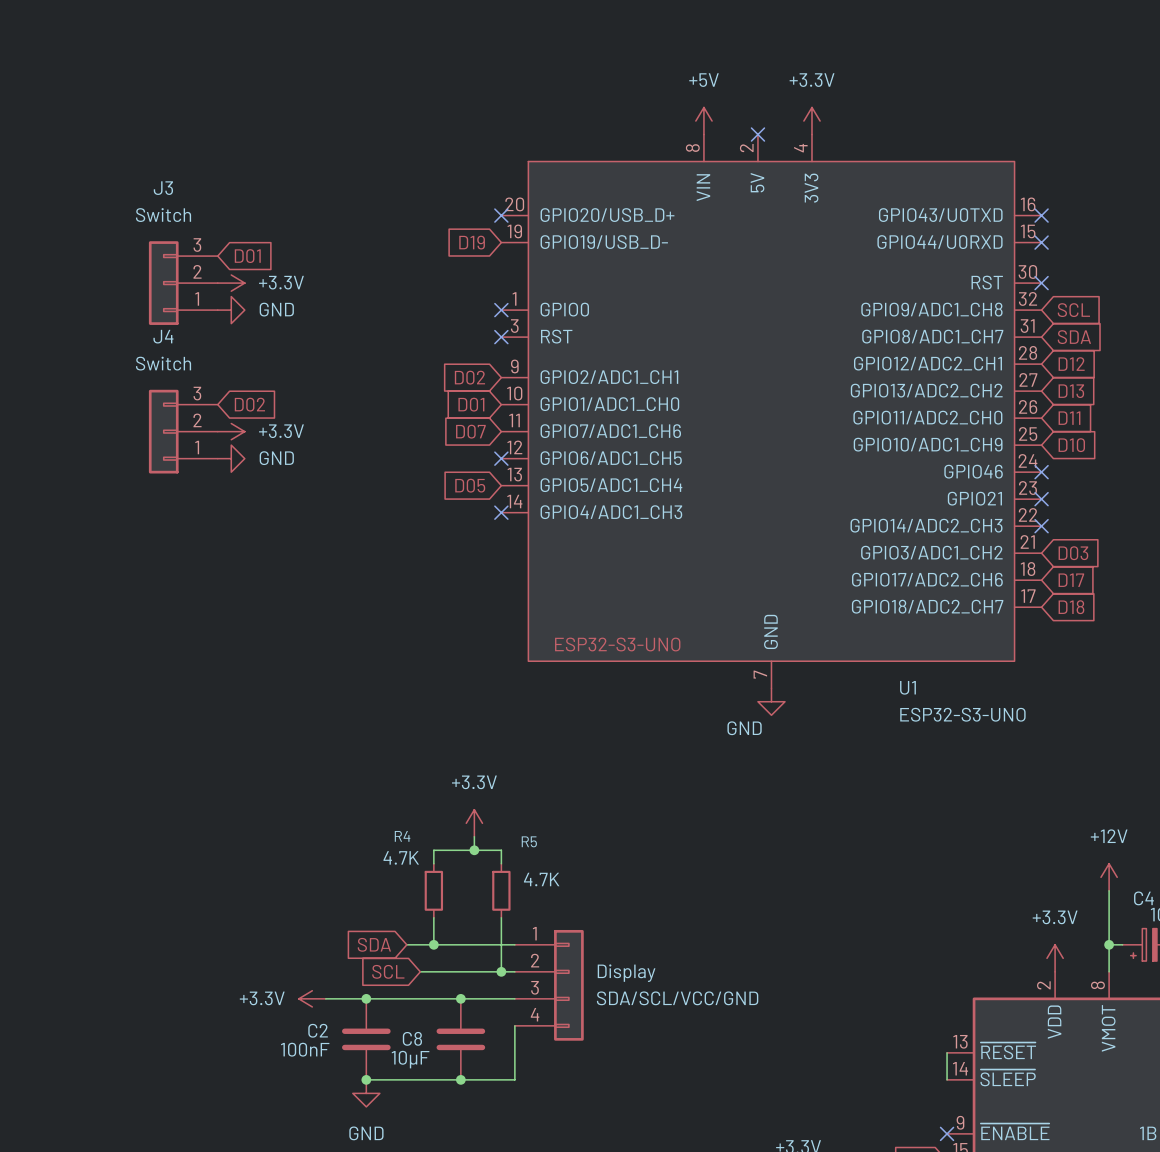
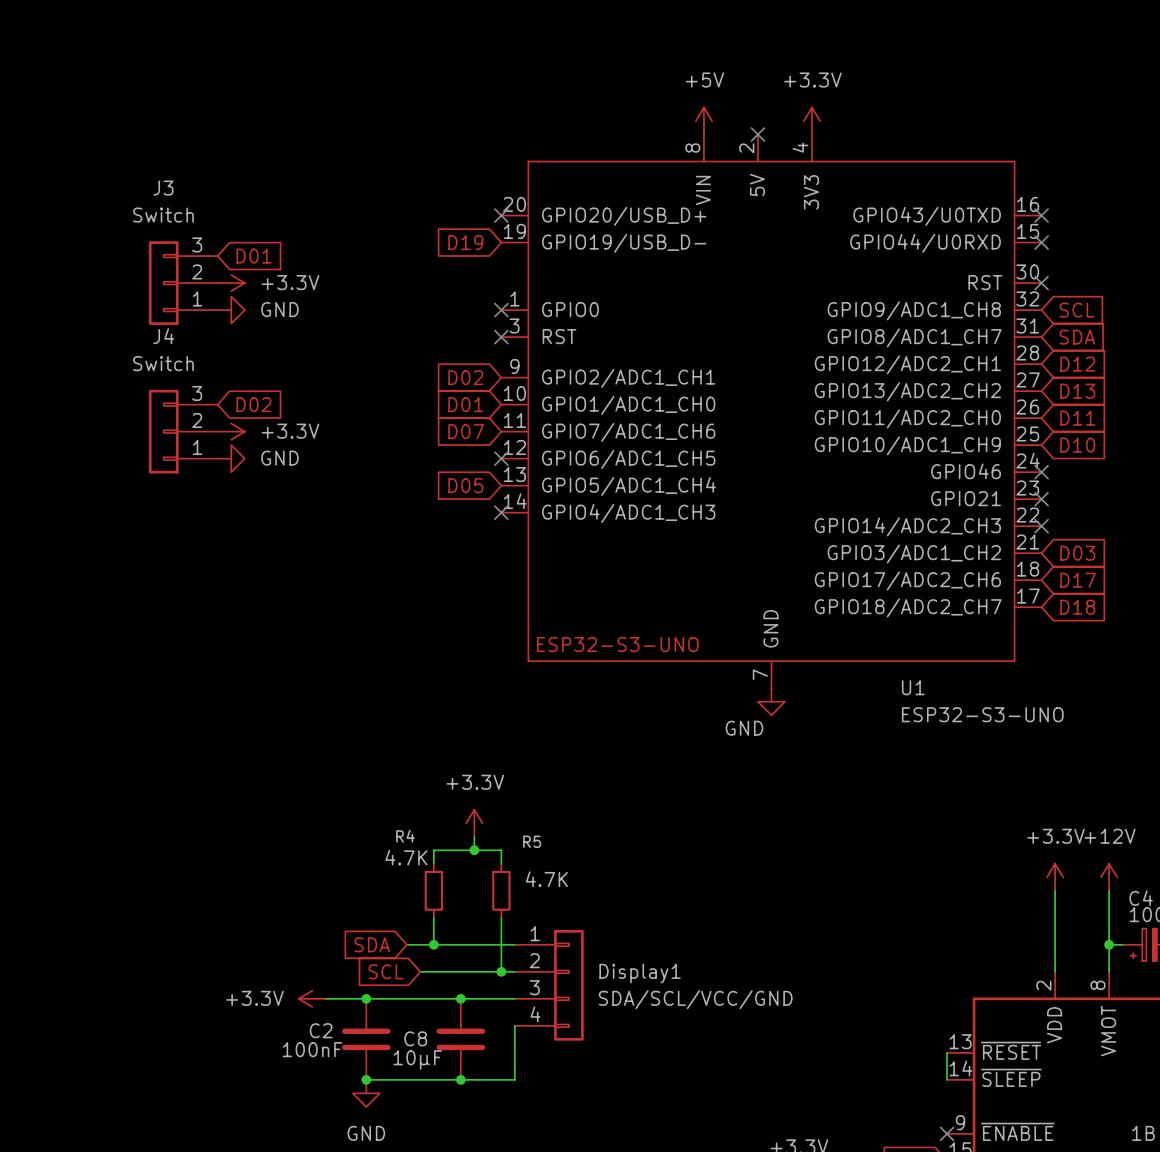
wire: none -> (1055, 890) (1055, 971)
power symbol position: +3.3V (1055, 958) -> +3.3V (1055, 877)
Display name: Display (626, 973) -> Display1 (640, 973)

